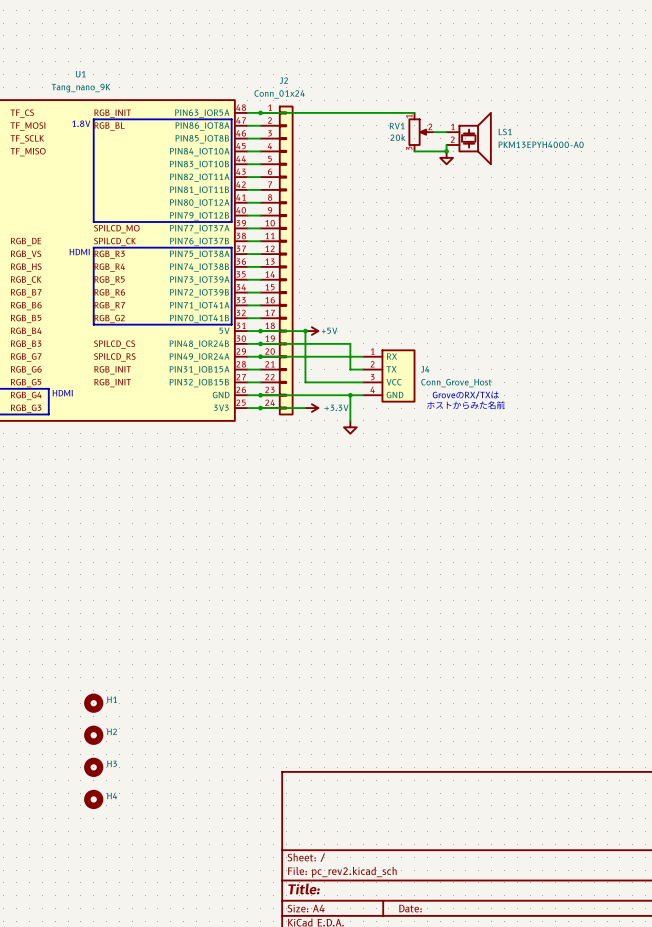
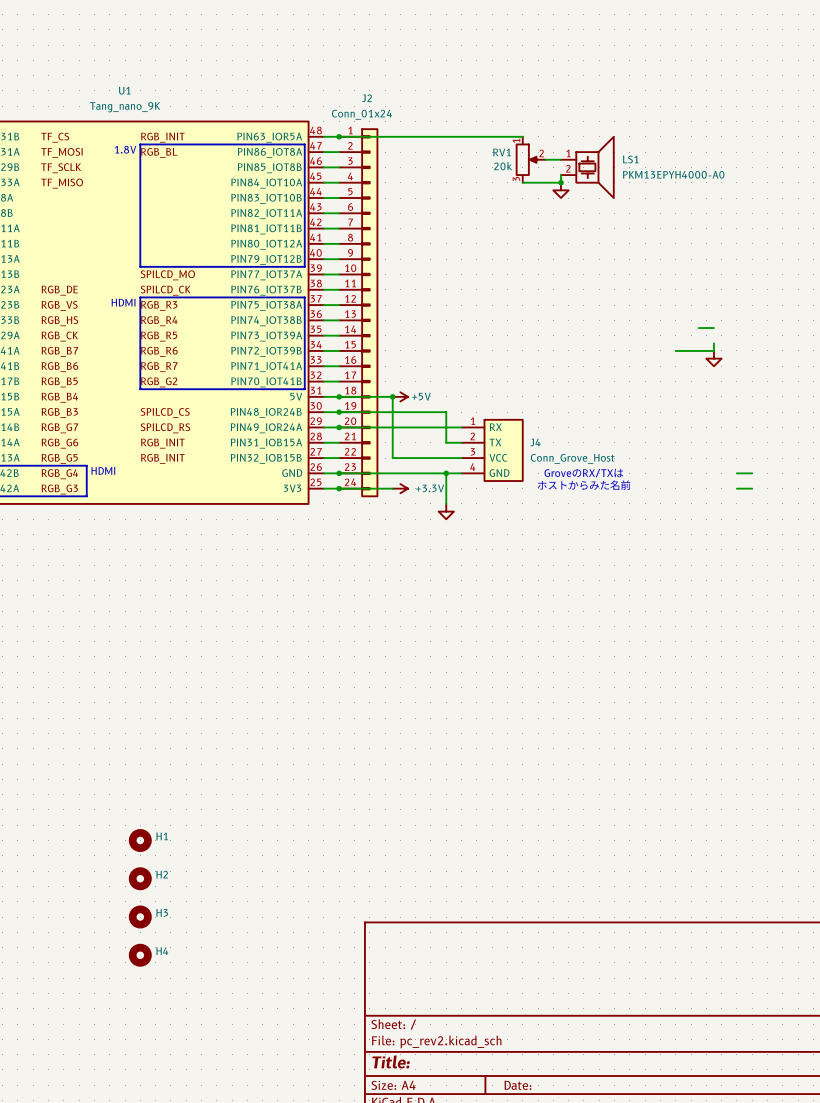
wire: none -> (698, 328) (713, 328)
wire: none -> (713, 343) (713, 350) (675, 350)
power symbol: none -> (713, 358)
wire: none -> (736, 473) (752, 473)
wire: none -> (736, 488) (752, 488)

